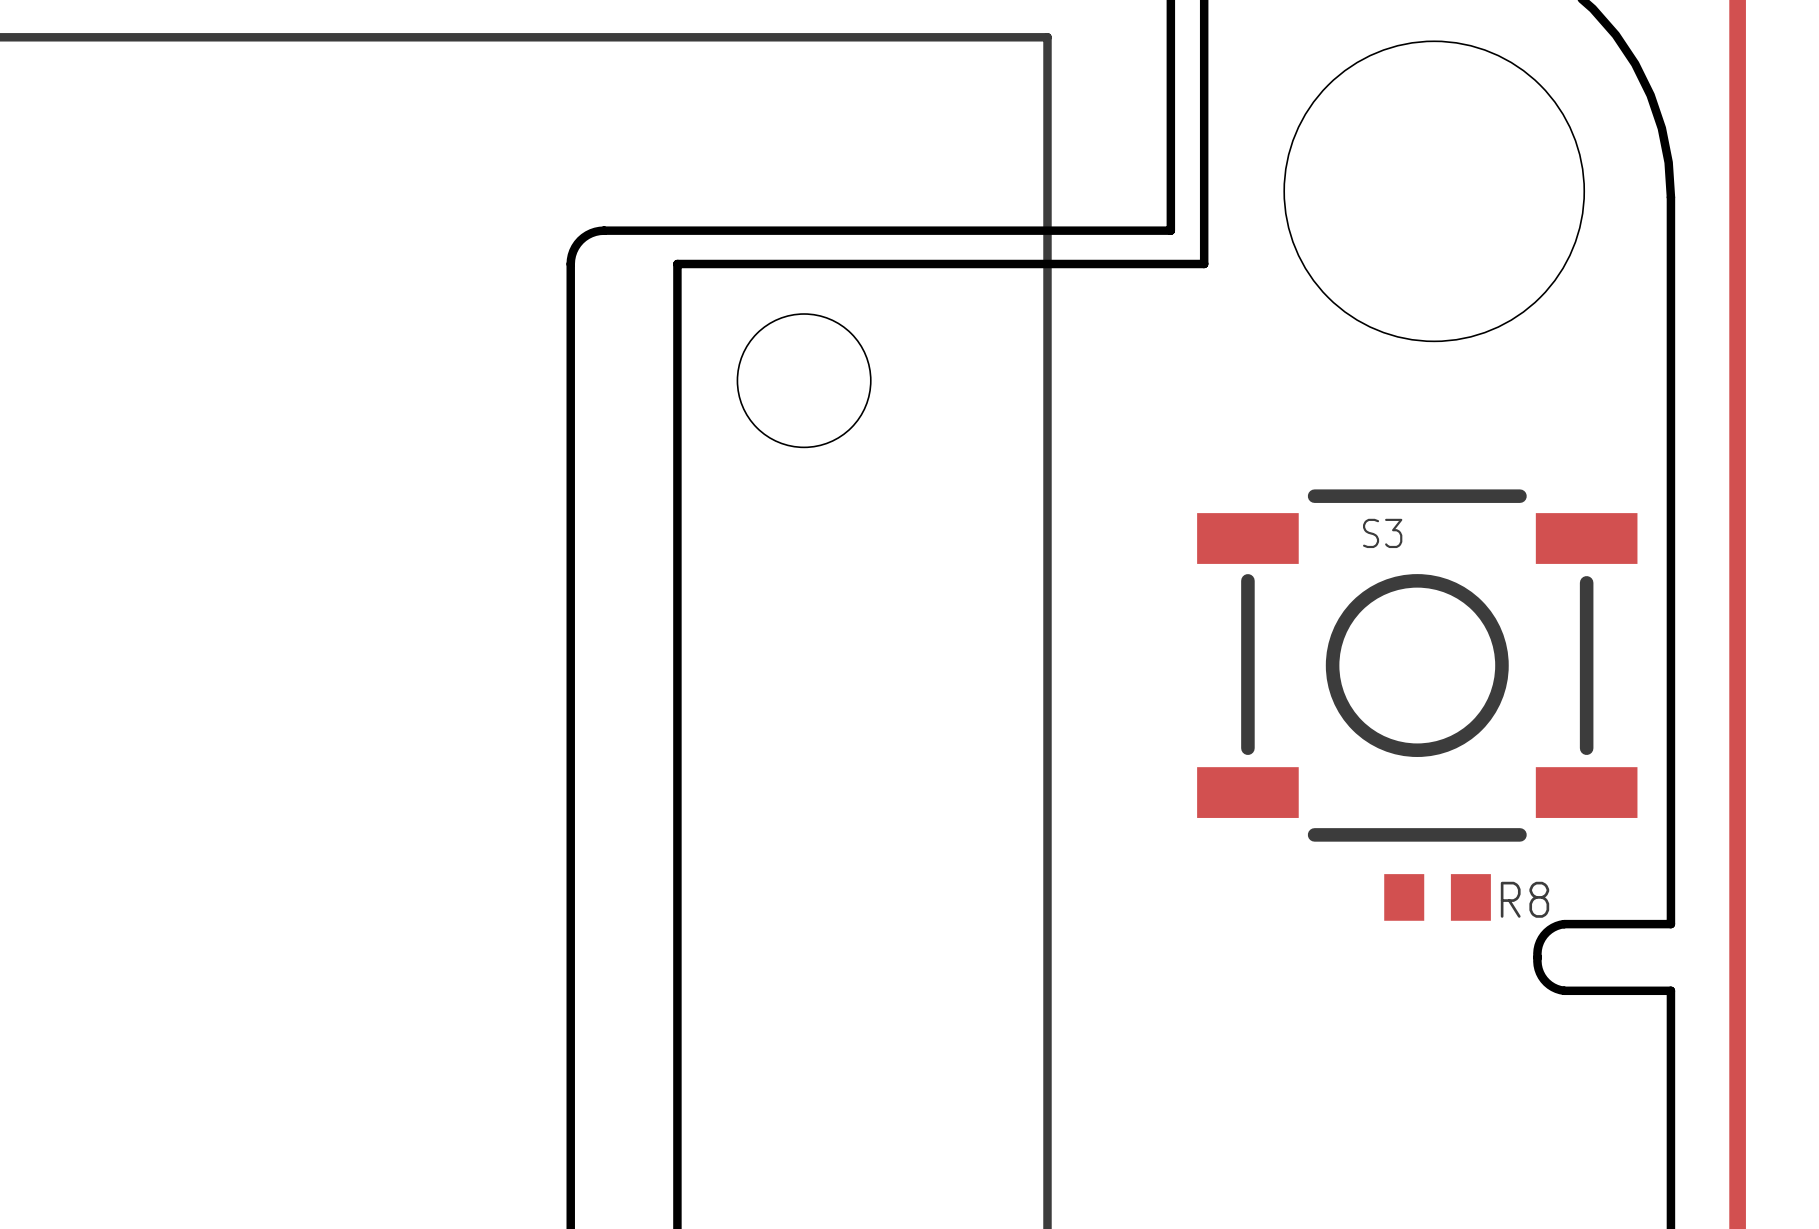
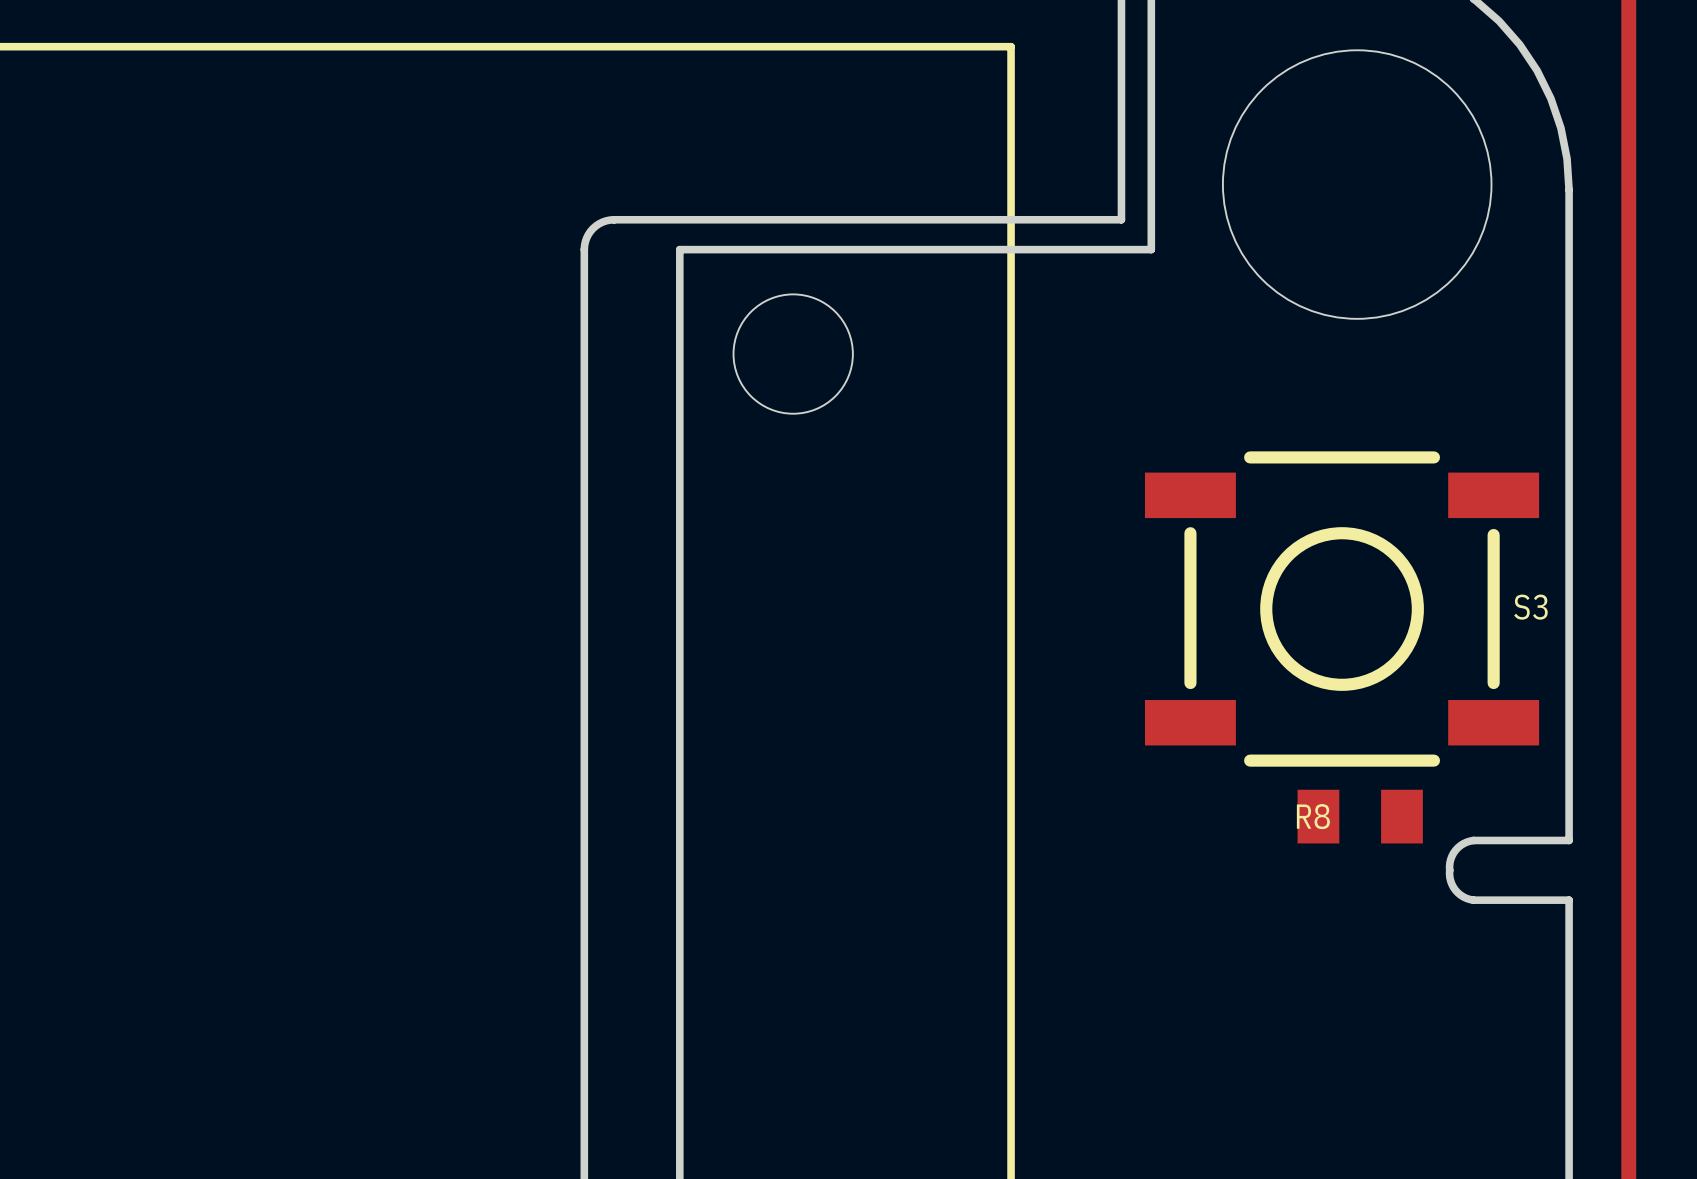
S3 name position: S3 (1382, 533) -> S3 (1530, 607)
R8 footprint: [1384, 874, 1491, 921] -> [1297, 789, 1423, 844]
R8 name position: R8 (1524, 899) -> R8 (1313, 816)

